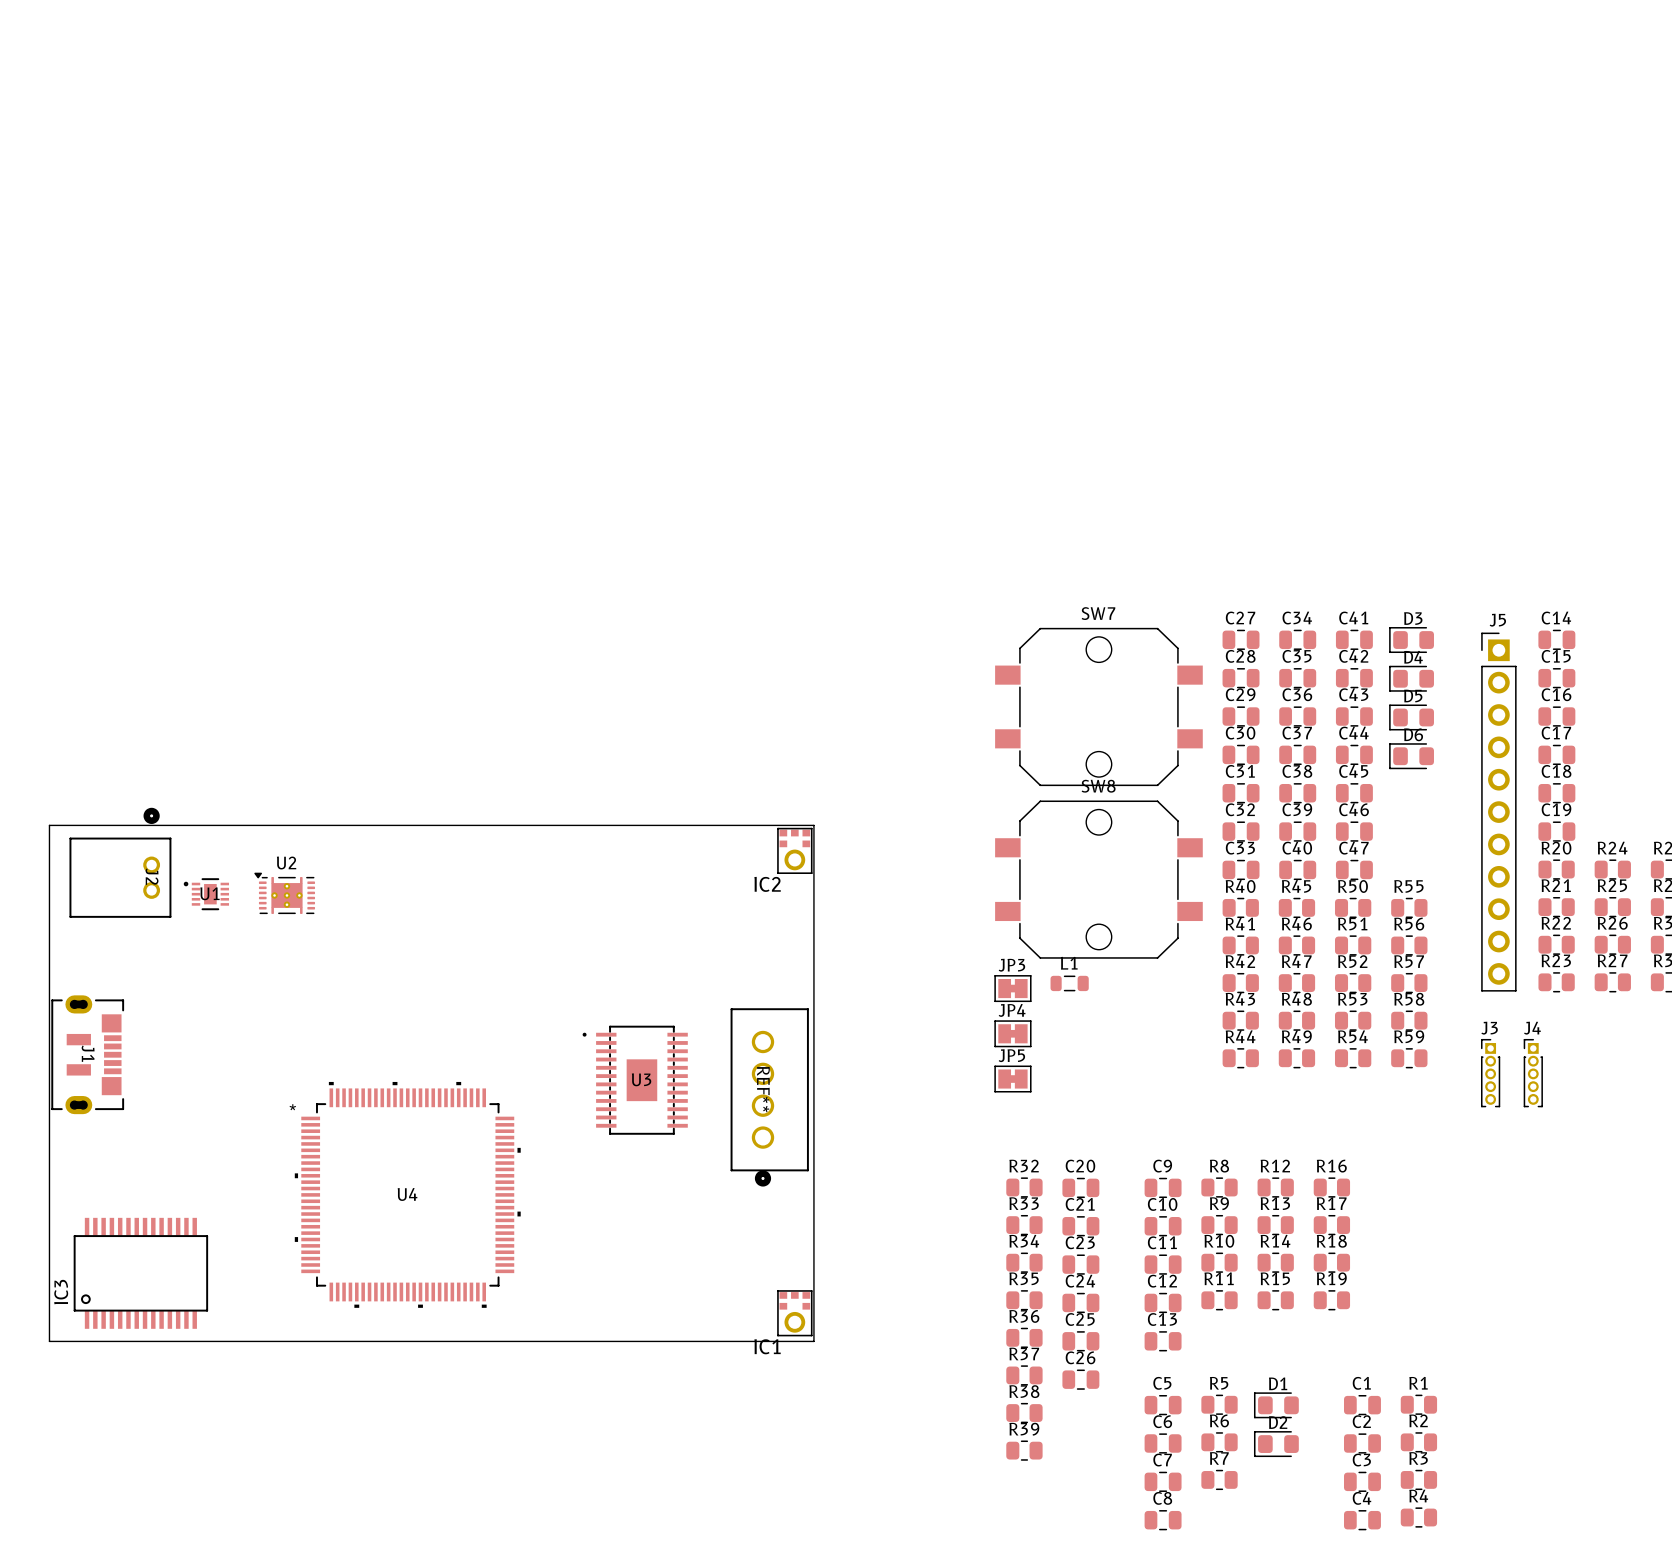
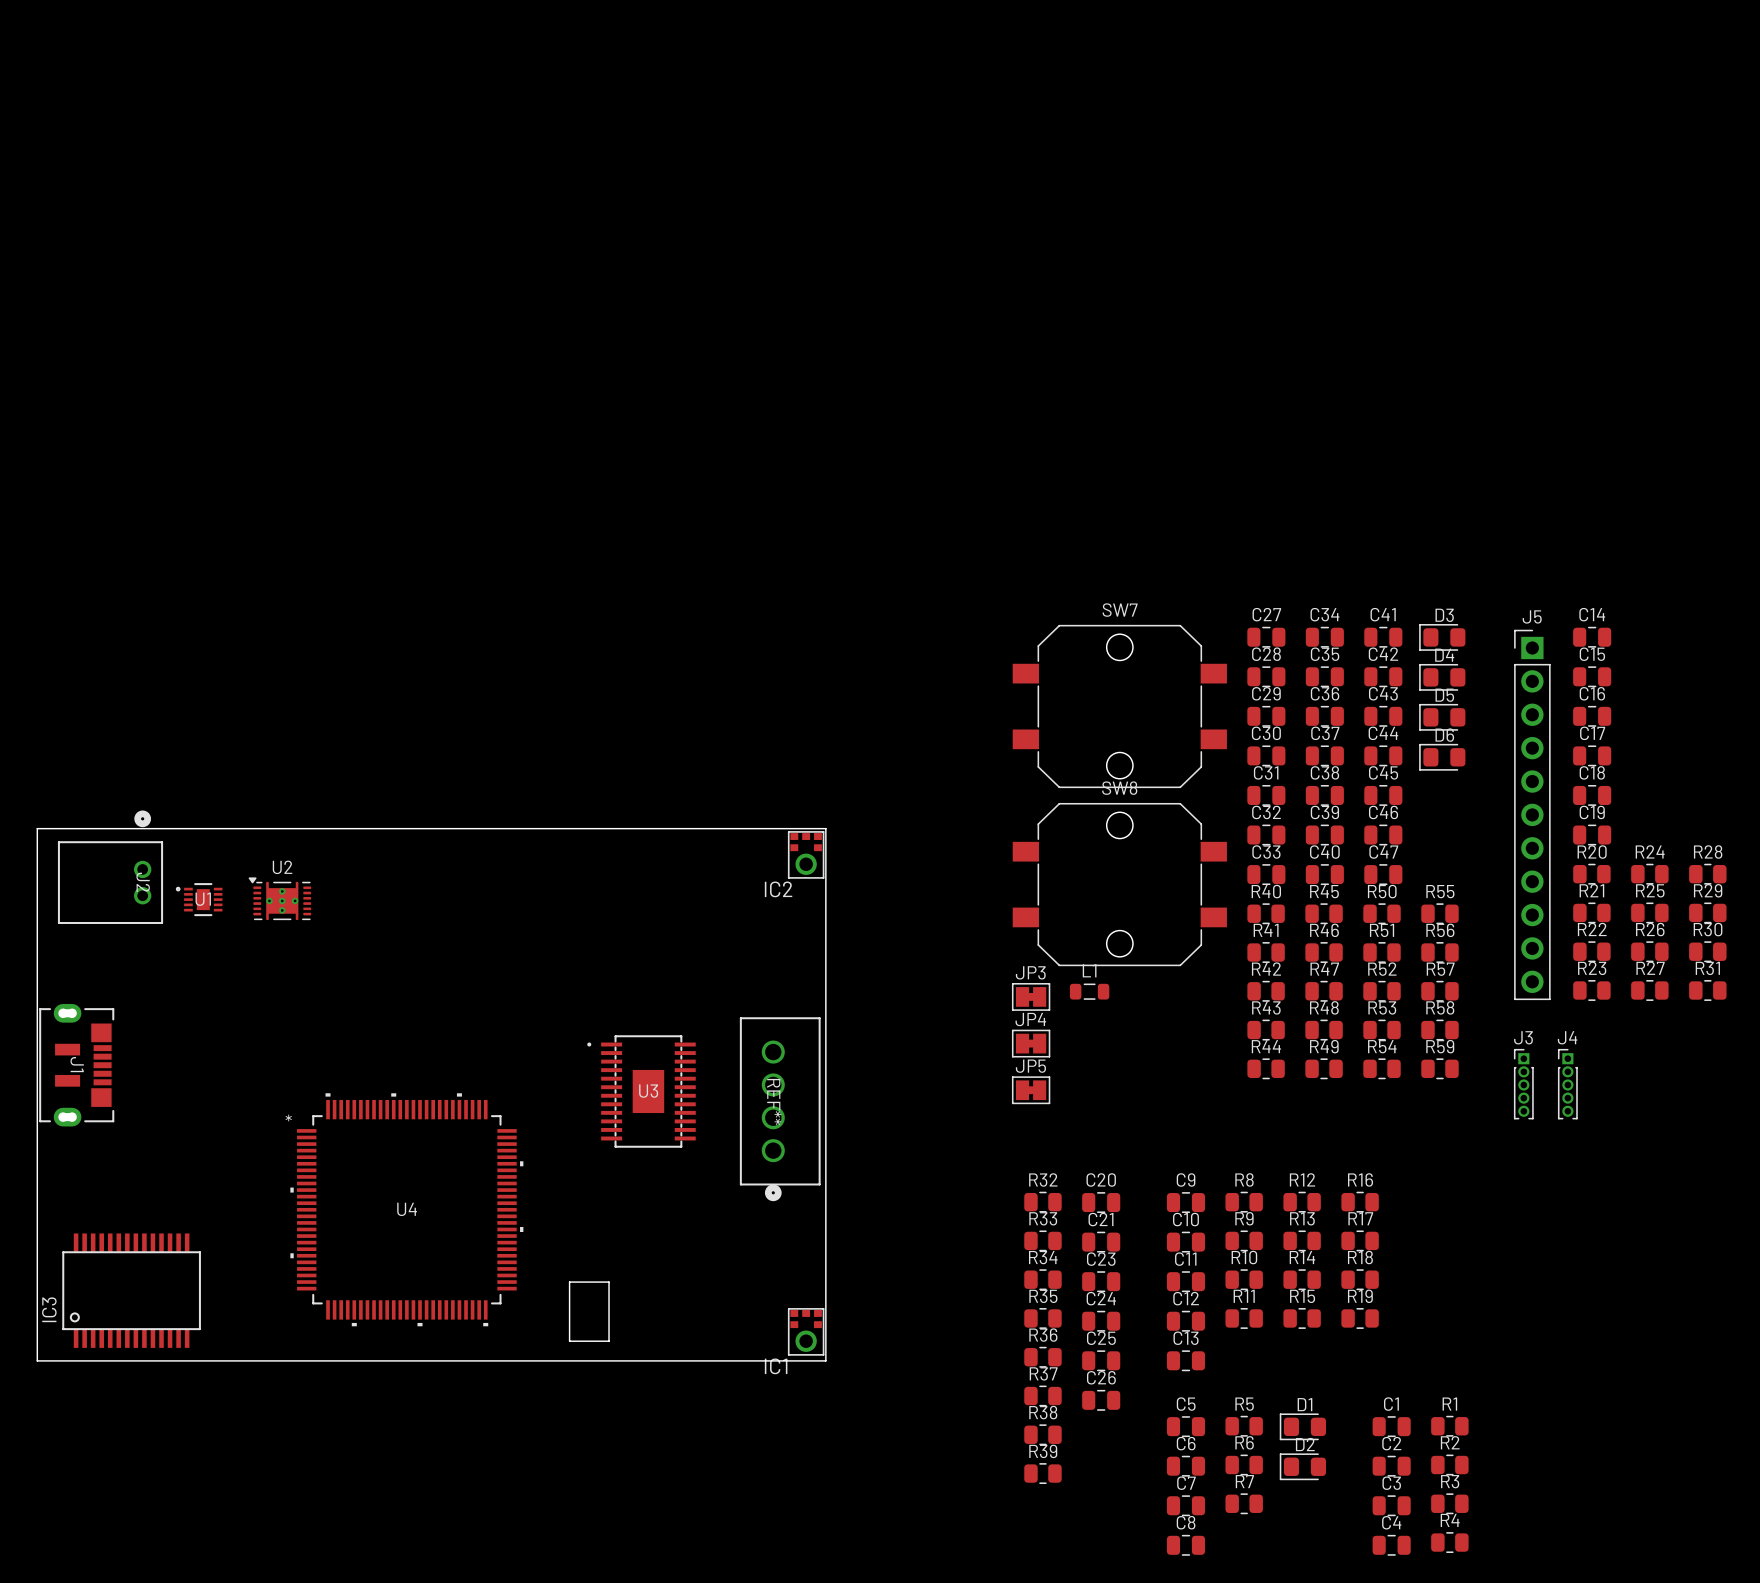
board edge: none -> (569, 1282) (609, 1282) (609, 1341) (569, 1341) (569, 1282)

